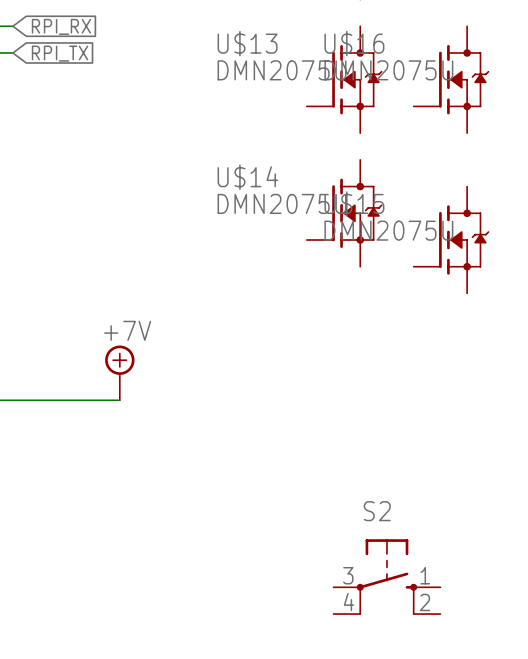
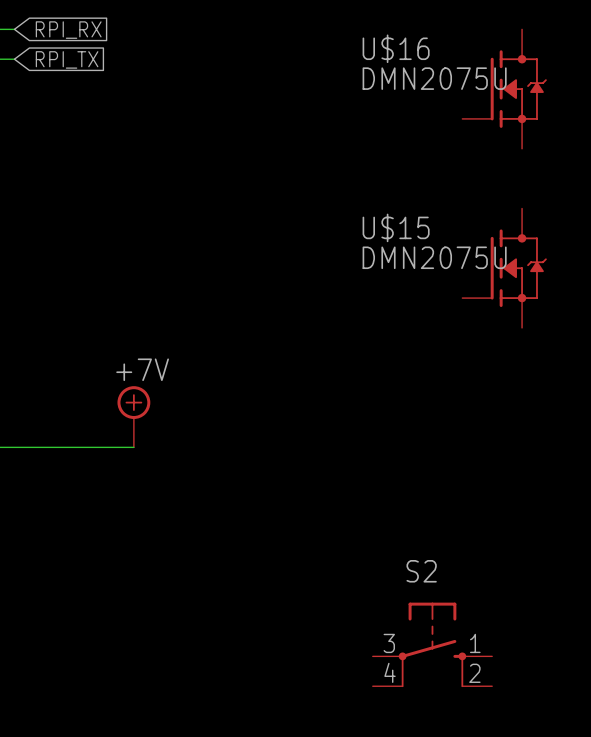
U$13: DMN2075U (344, 79) -> none
U$14: DMN2075U (344, 213) -> none

